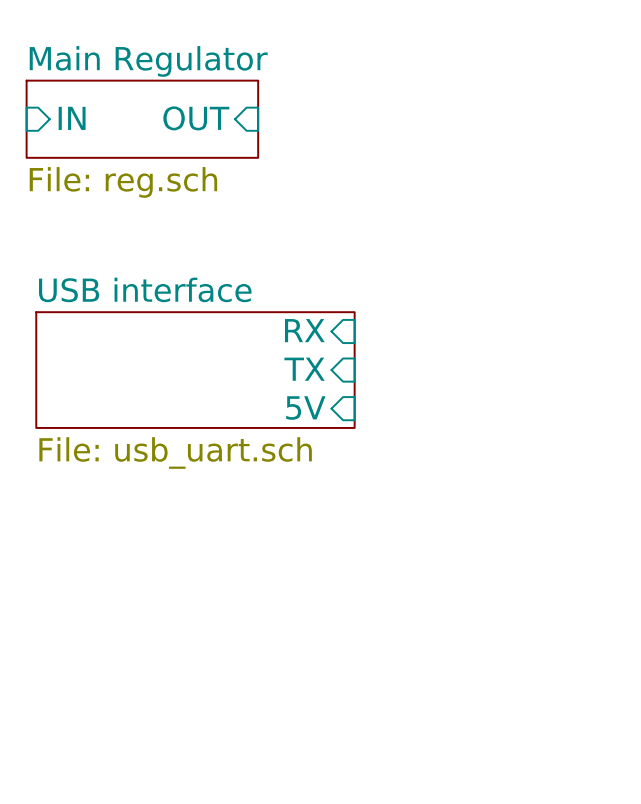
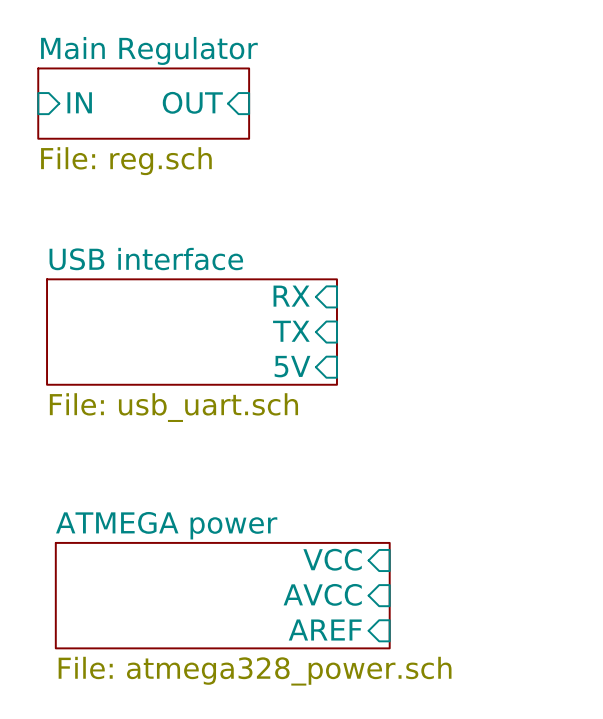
sheet pin: none -> VCC (332, 559)
sheet pin: none -> AVCC (322, 594)
sheet ATMEGA power: none -> File: atmega328_power.sch (222, 595)
sheet pin: none -> AREF (325, 630)

